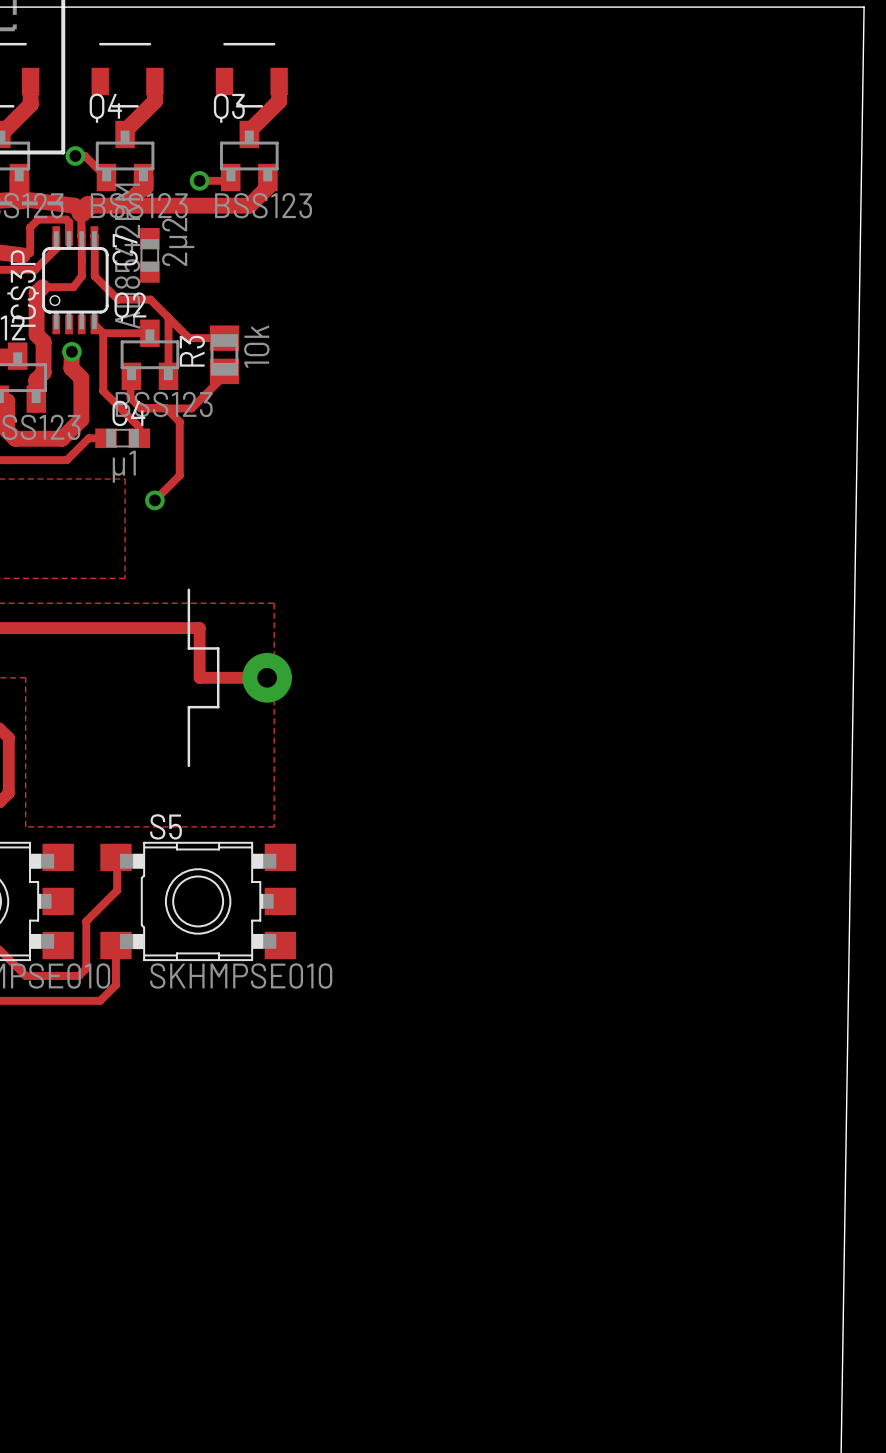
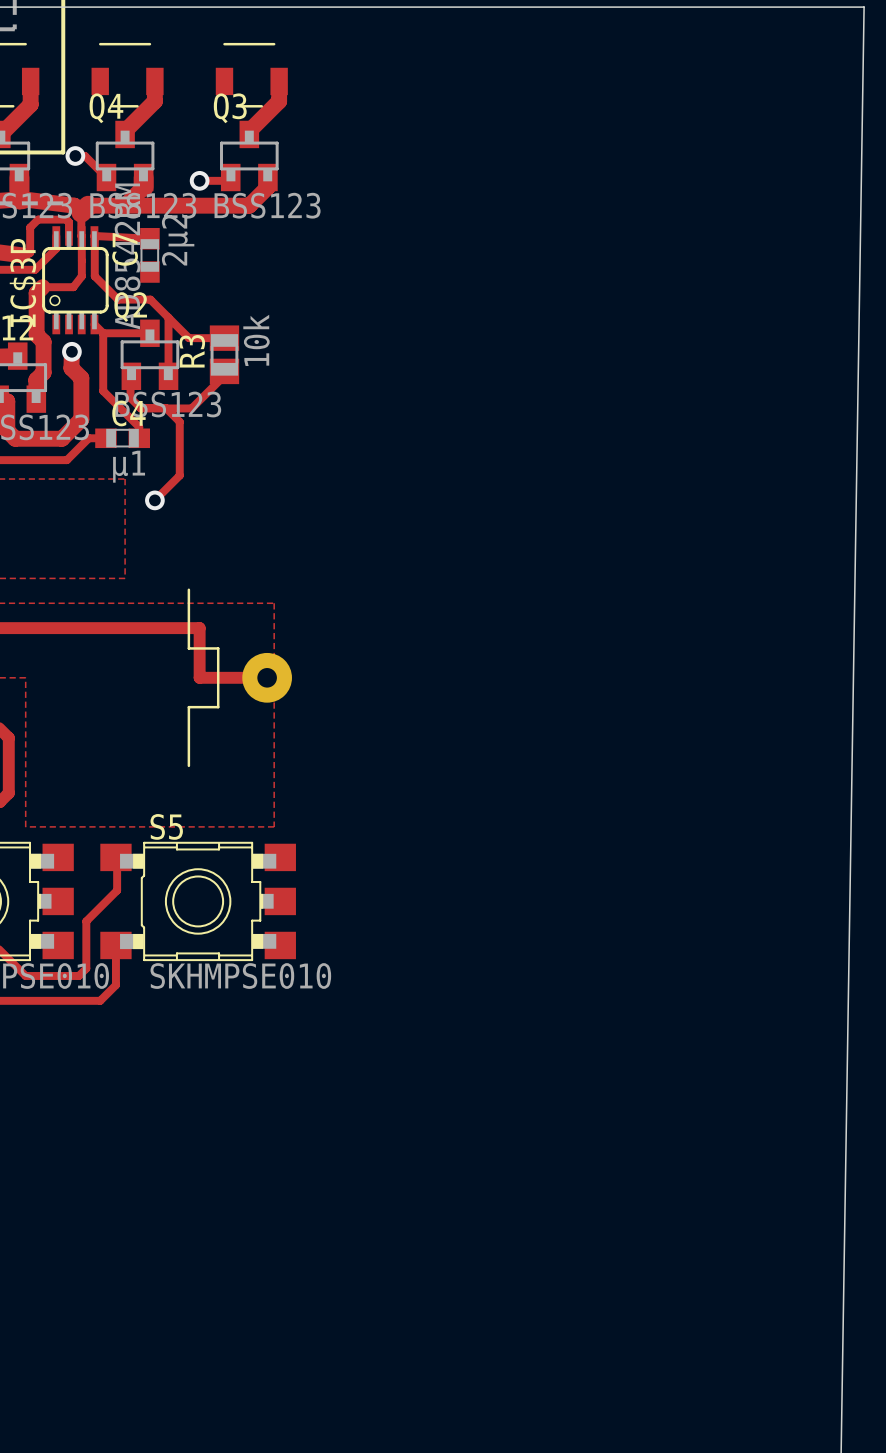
track: none -> (94, 235) (149, 238)

